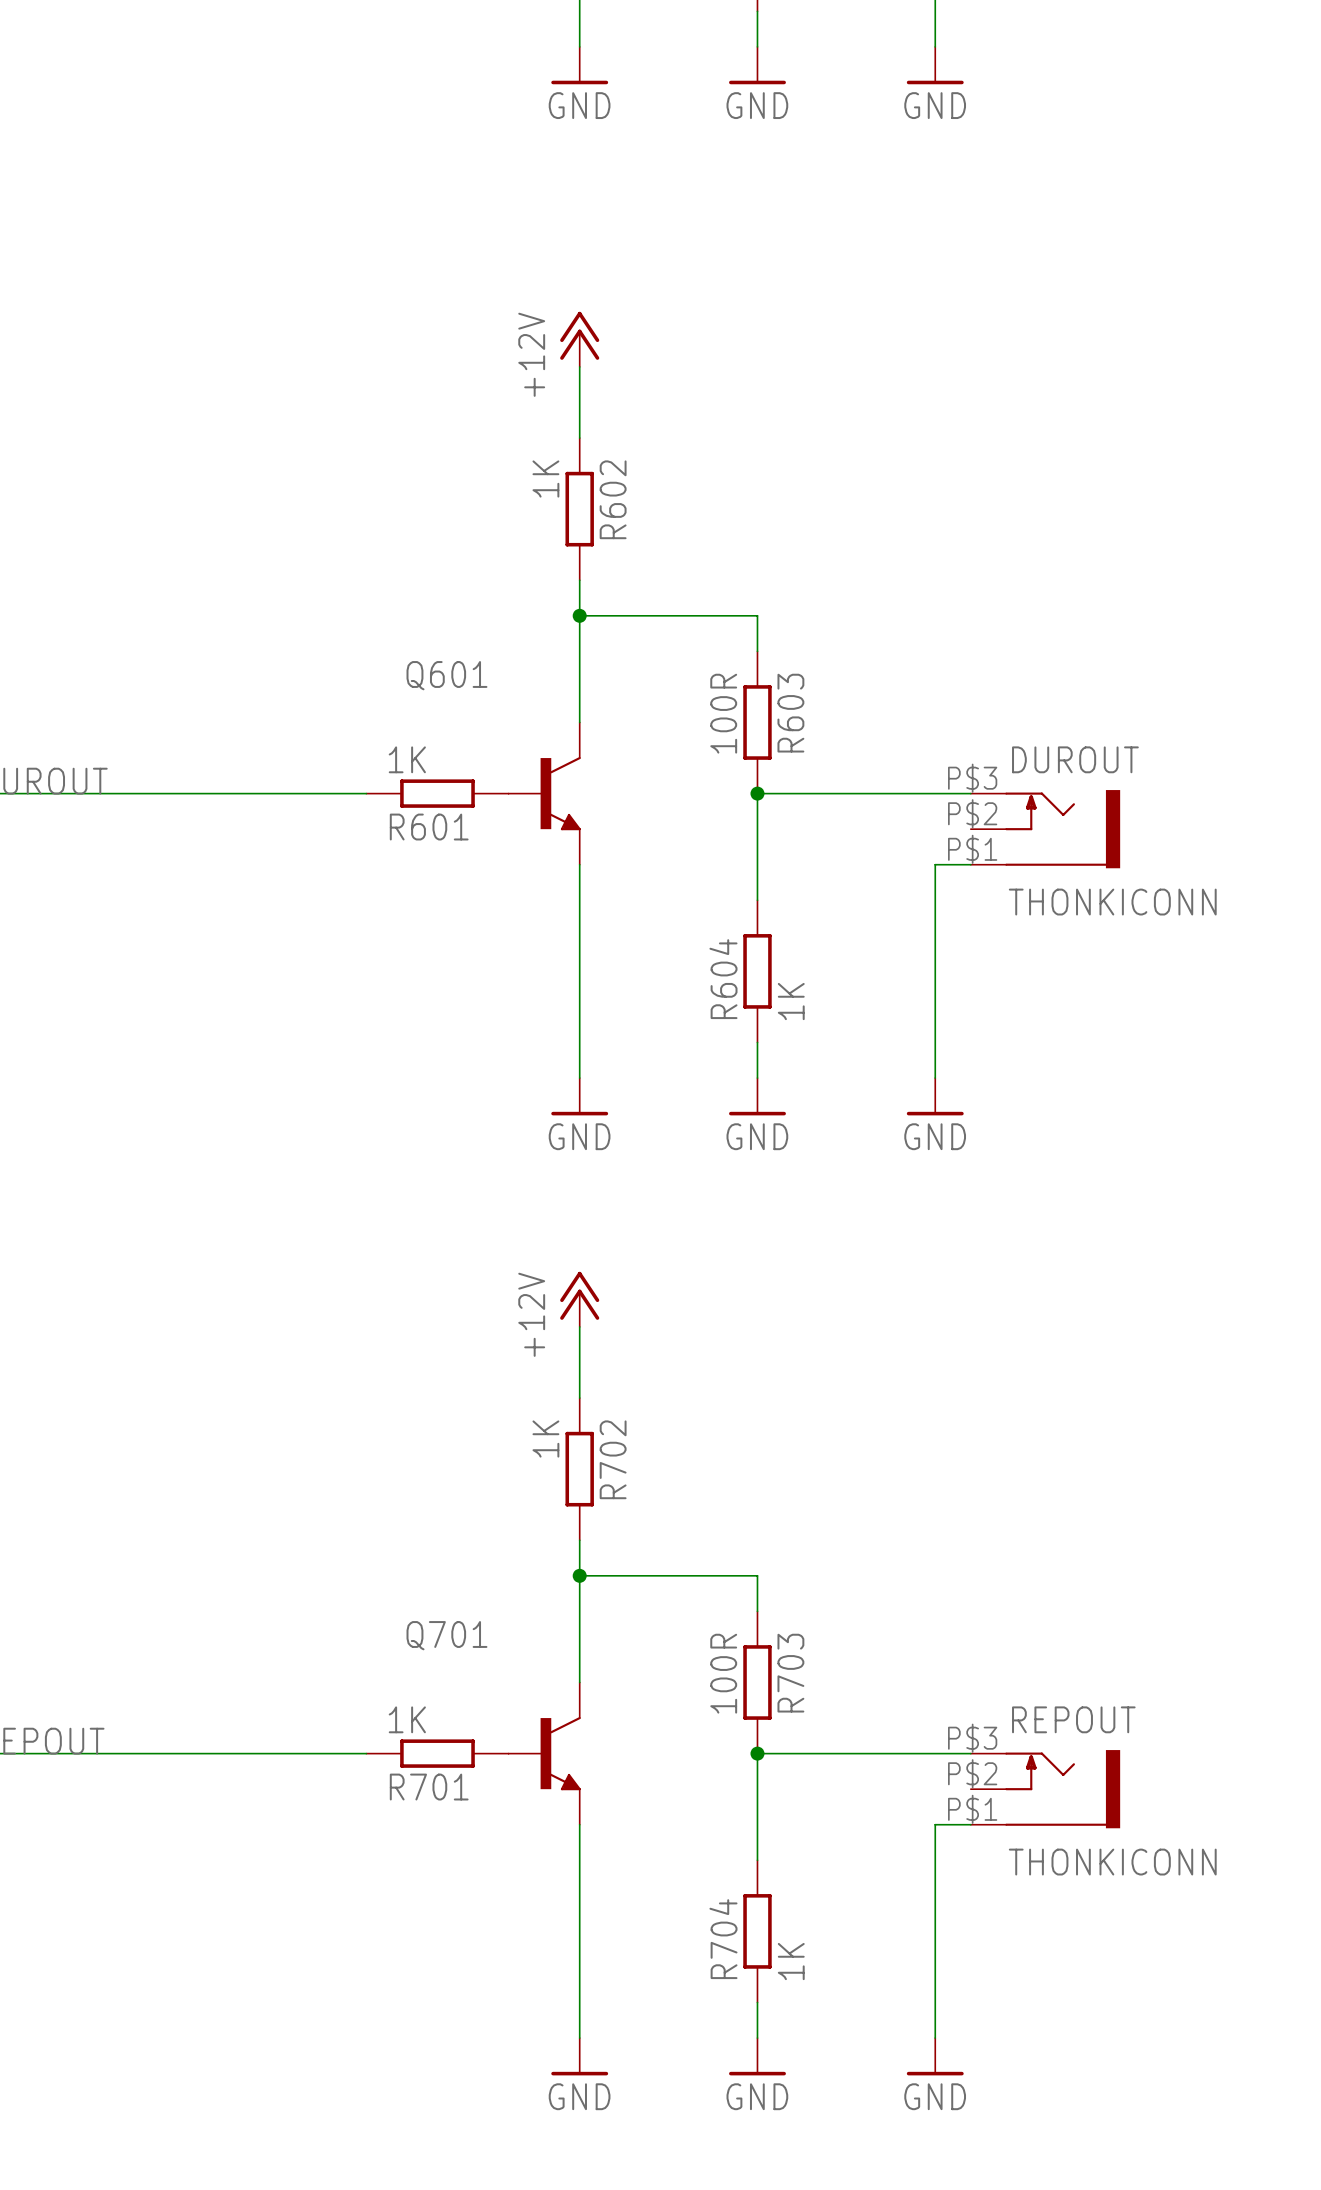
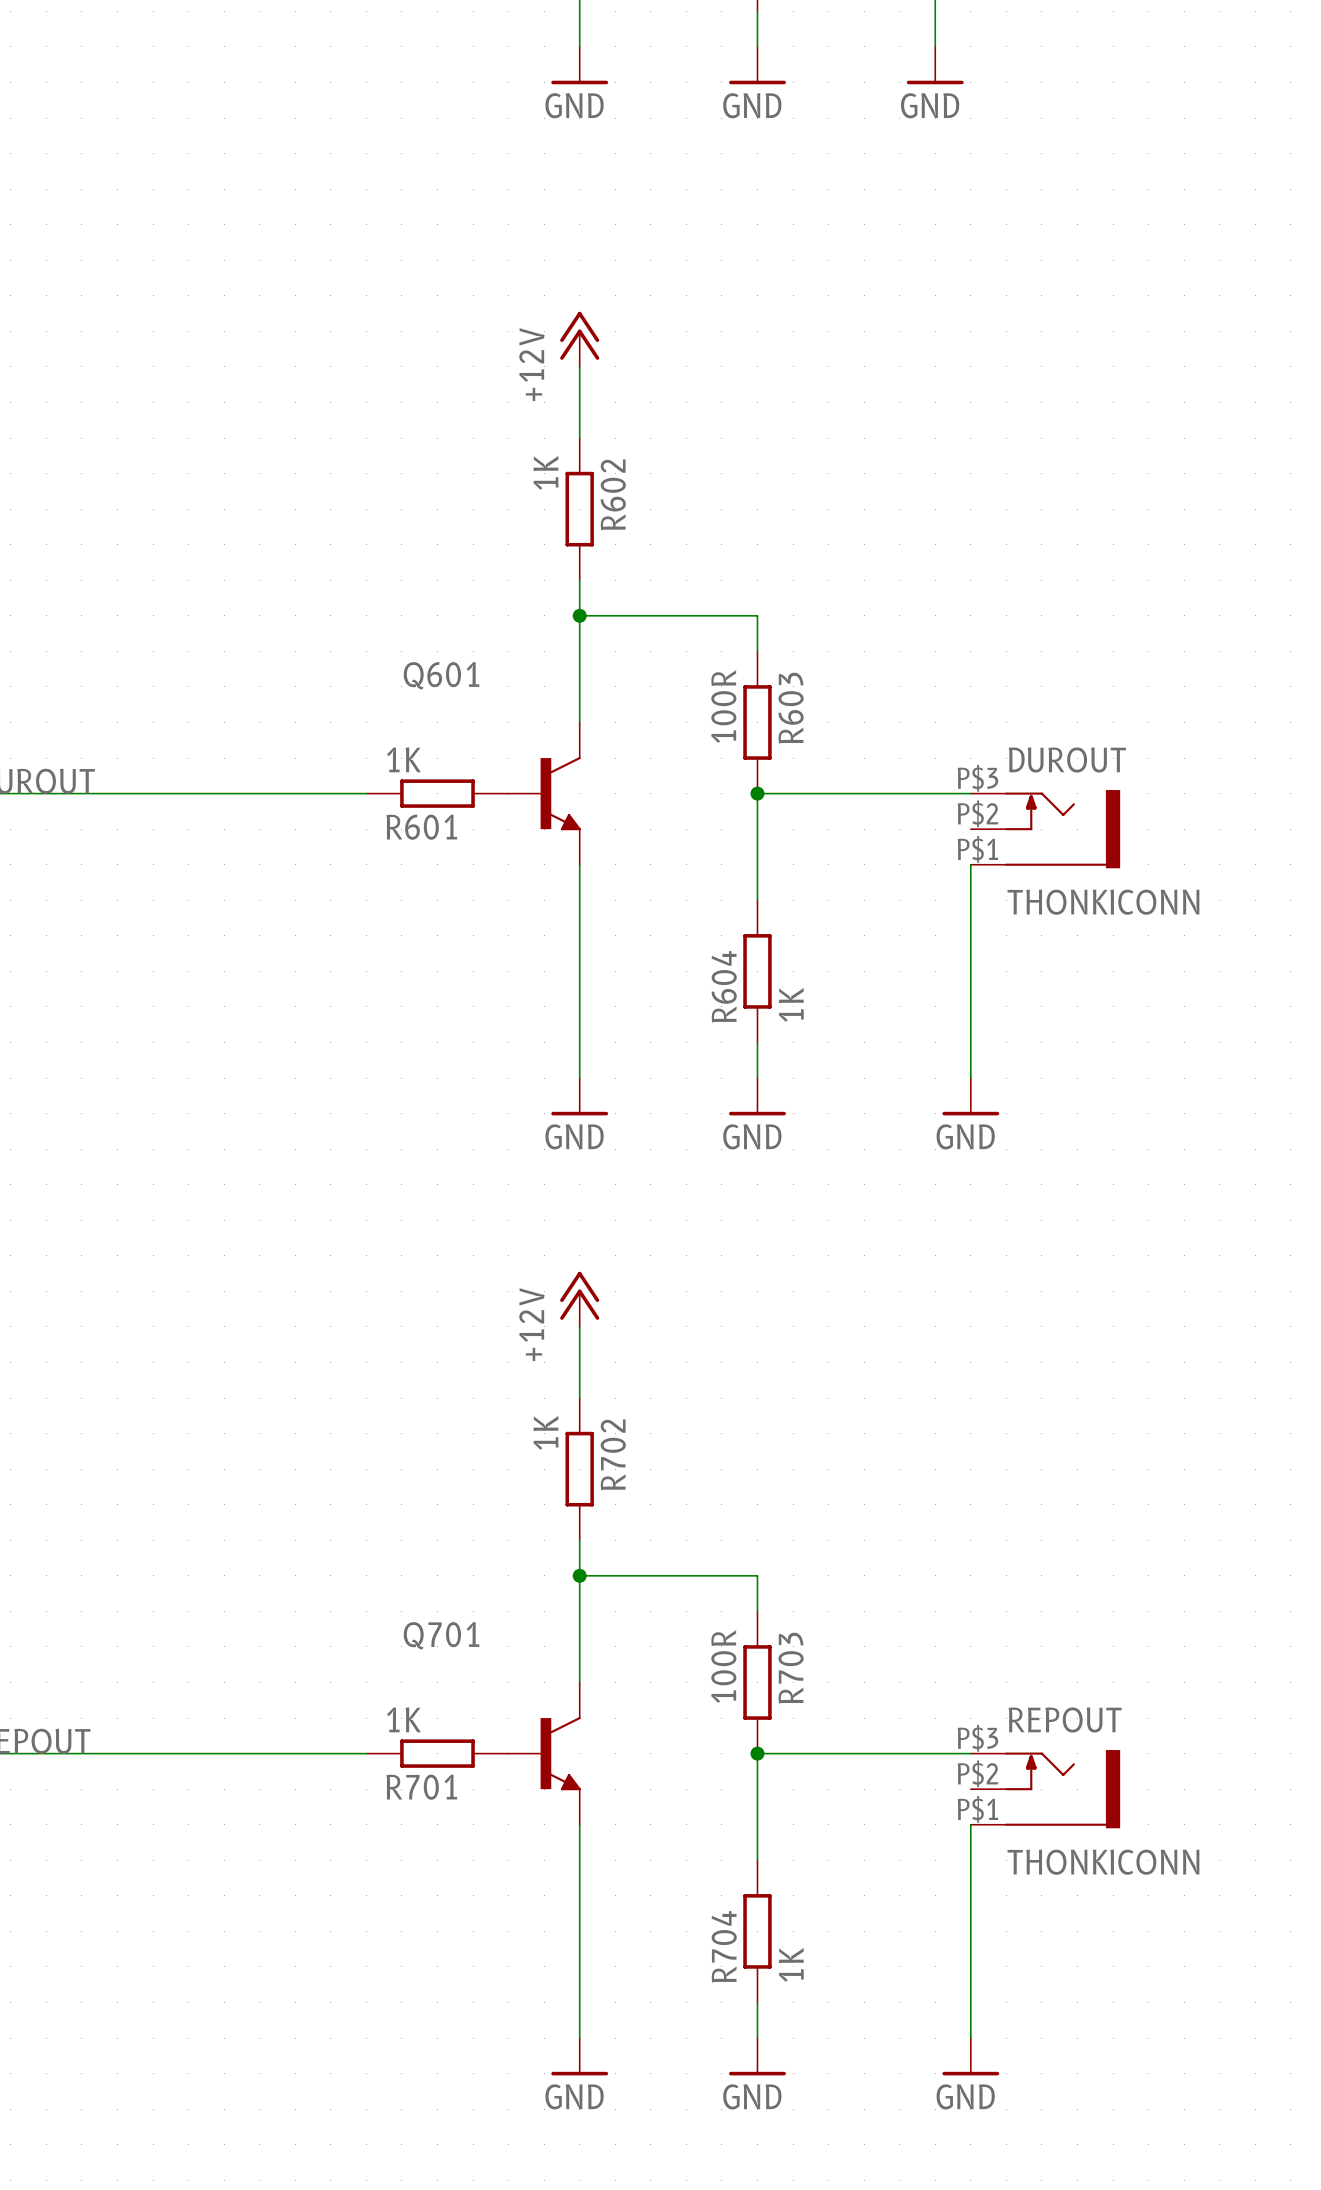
wire: (970, 864) (935, 864) (935, 1078) -> (970, 864) (970, 1078)
power symbol position: GND (935, 1096) -> GND (970, 1096)
wire: (970, 1824) (935, 1824) (935, 2038) -> (970, 1824) (970, 2038)
power symbol position: GND (935, 2056) -> GND (970, 2056)

